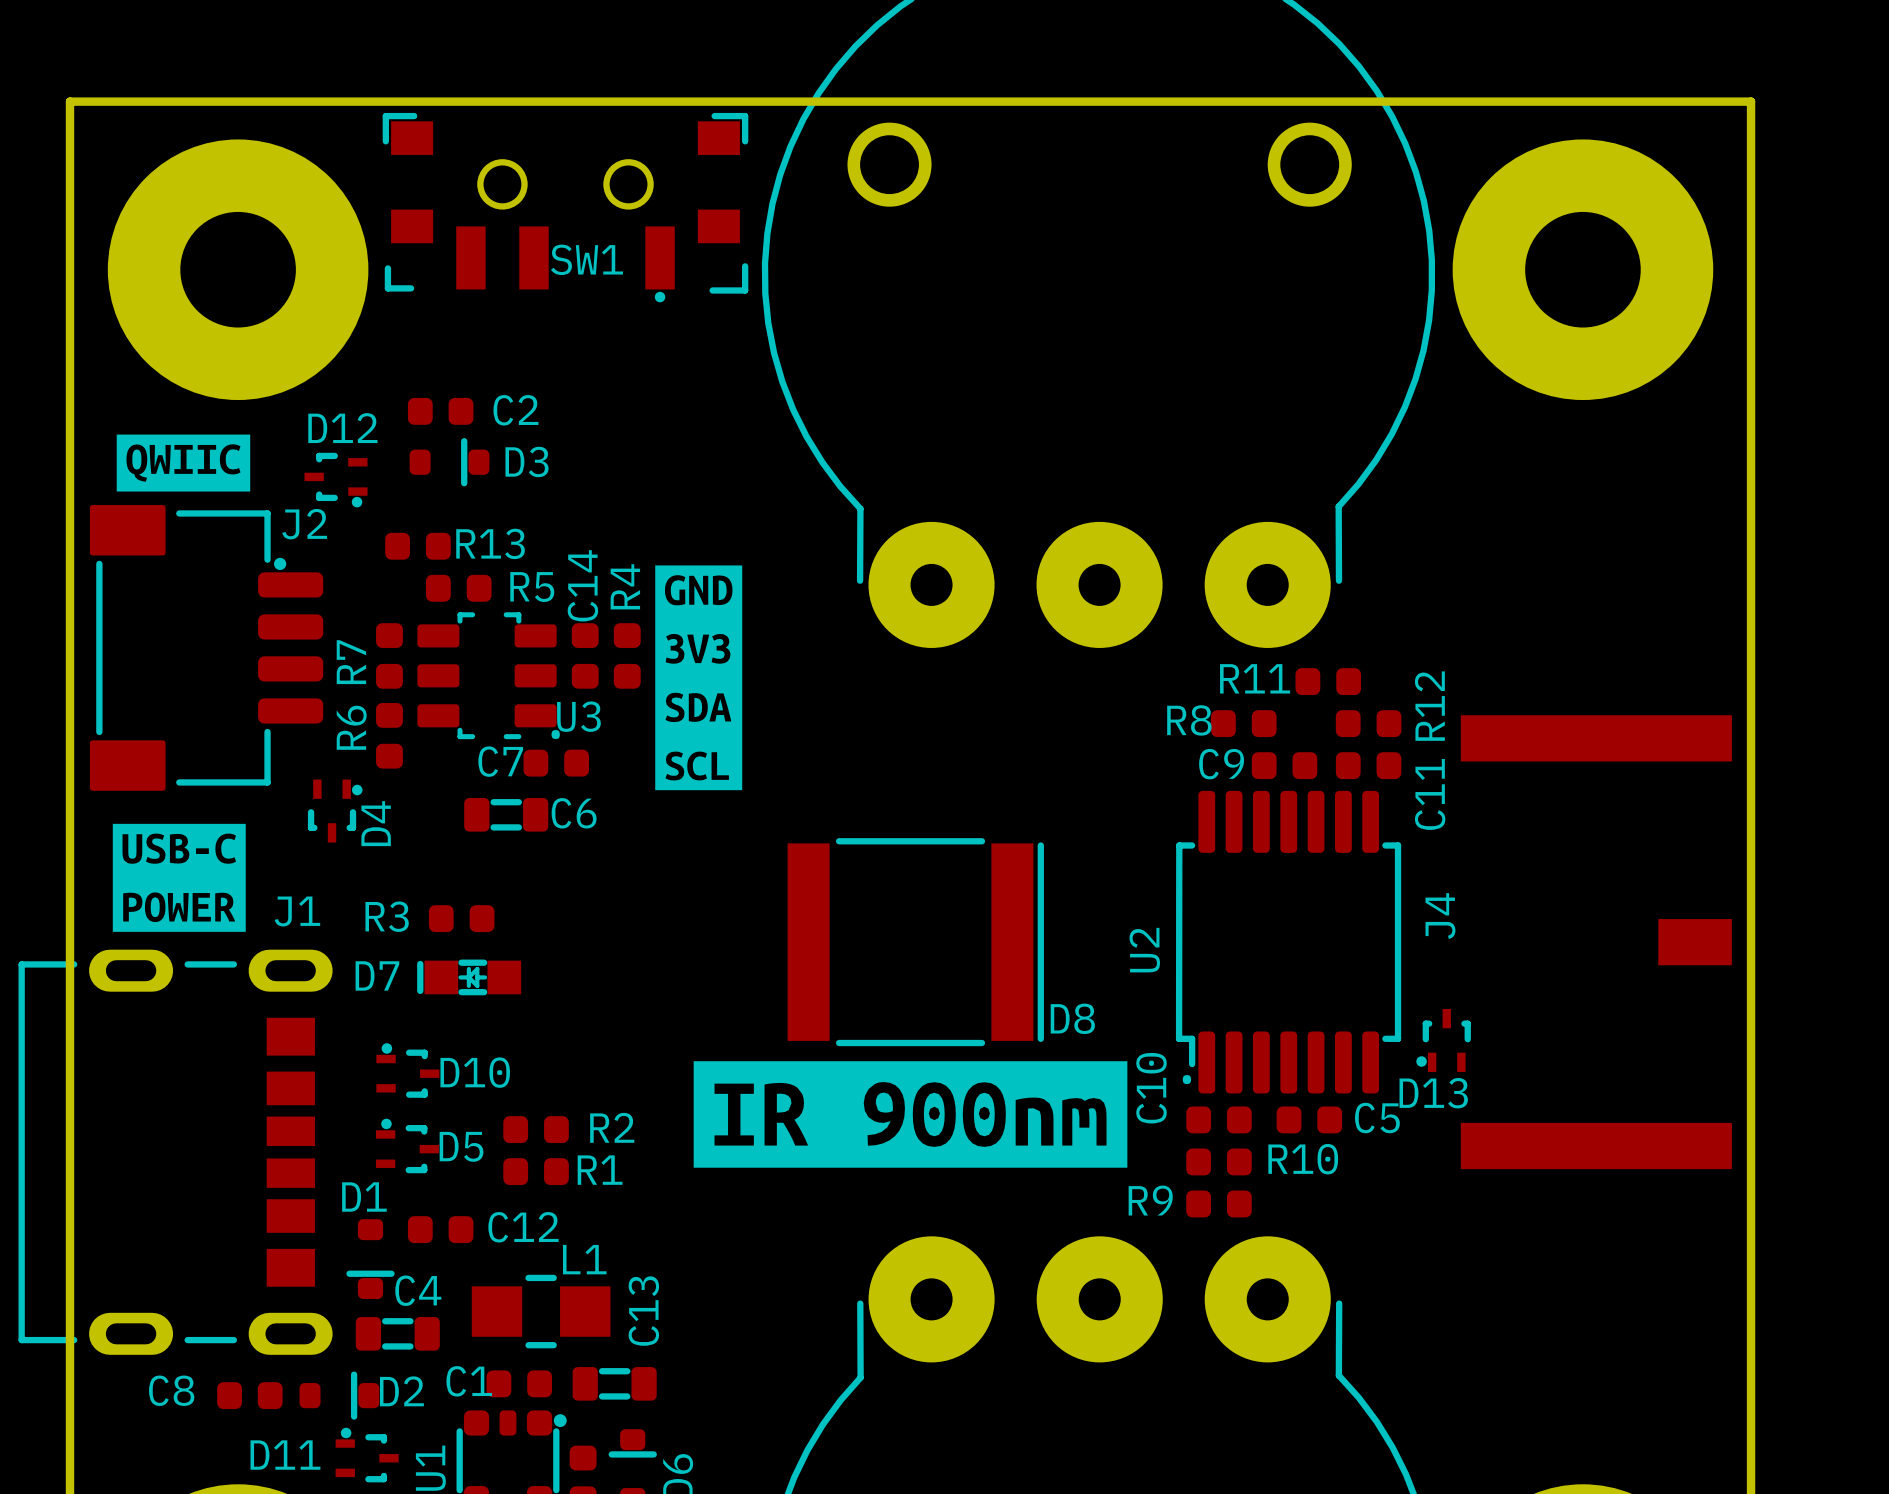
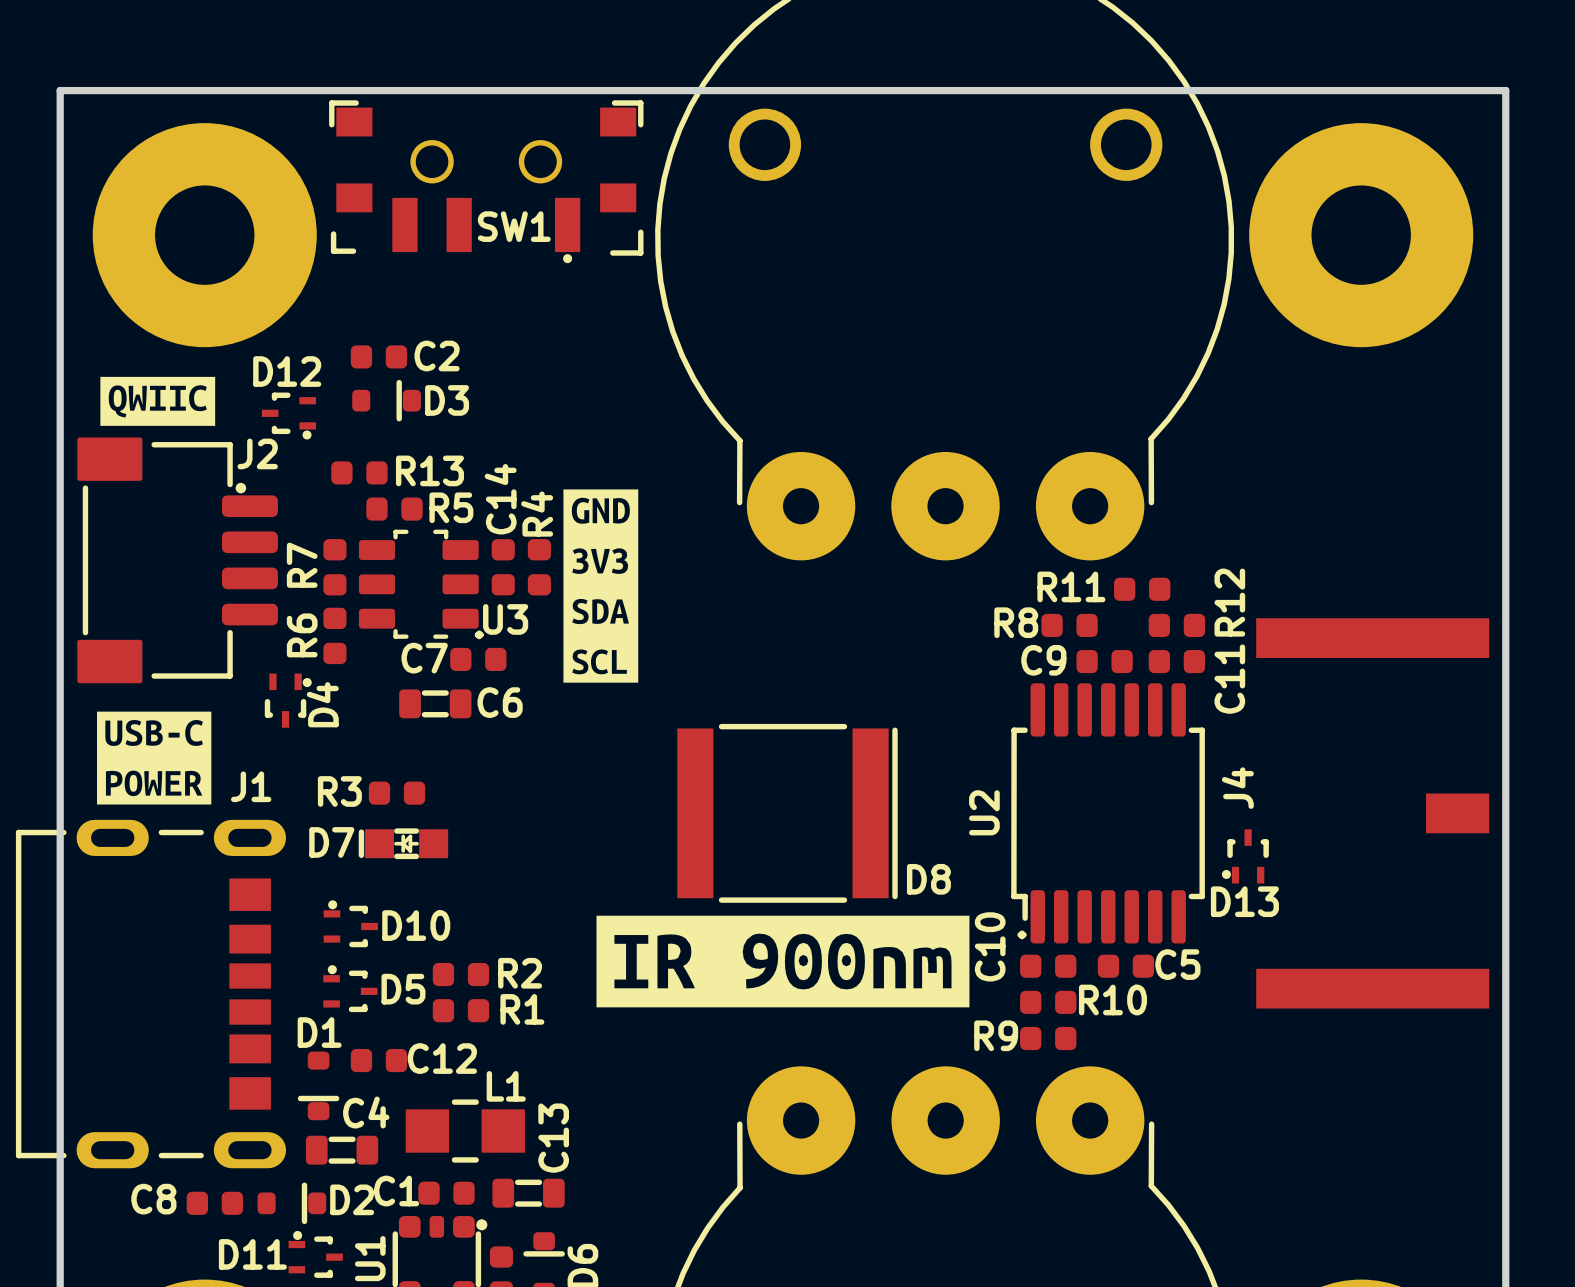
D13 position: (1443, 1040) -> (1245, 856)

